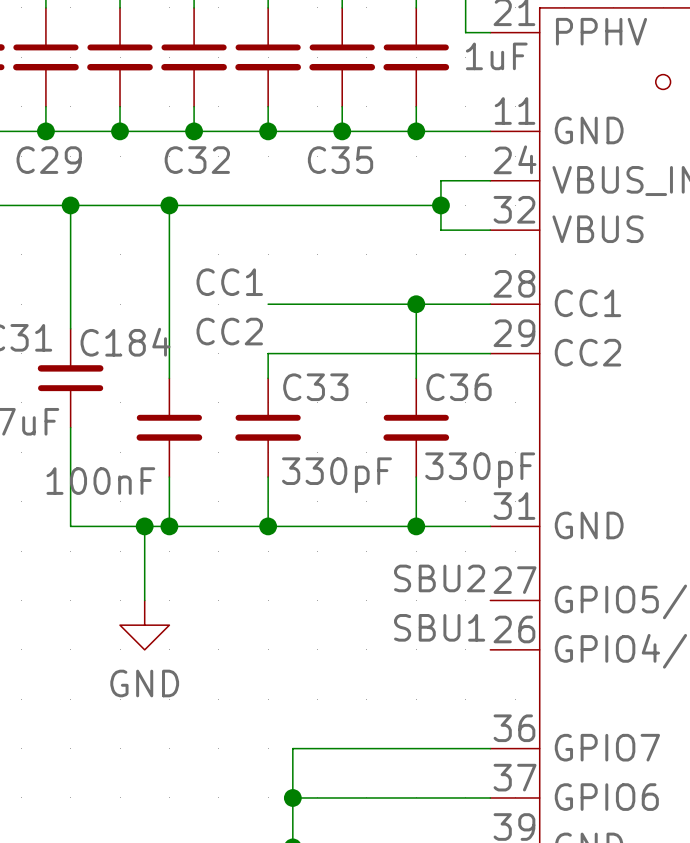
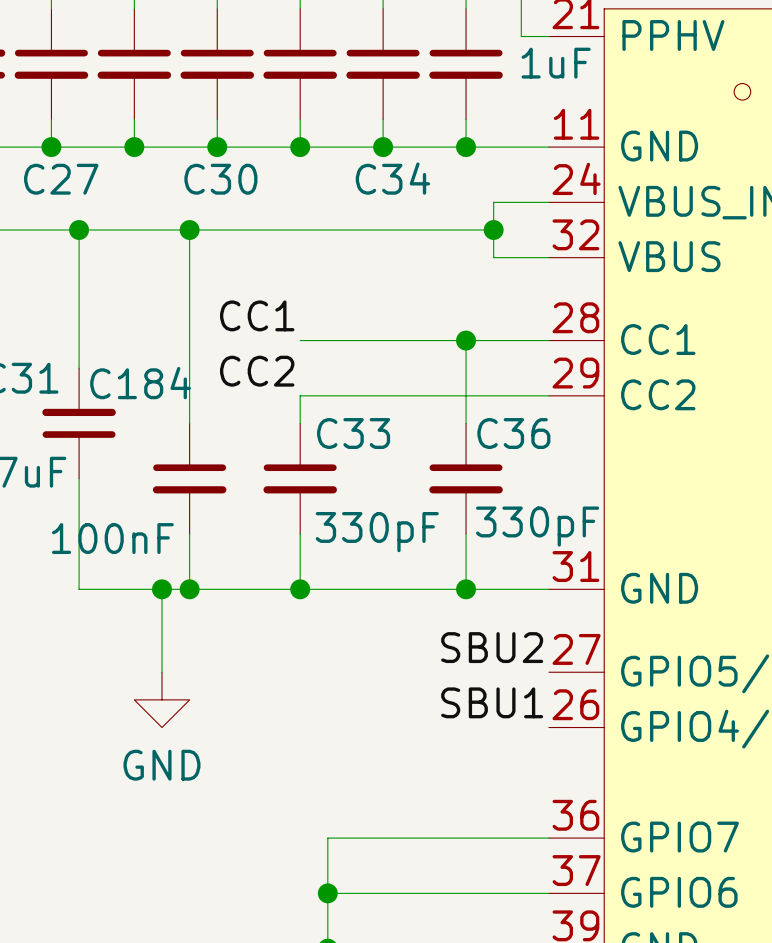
C29 name: C29 (49, 160) -> C27 (61, 179)
C32 name: C32 (197, 160) -> C30 (220, 179)
C35 name: C35 (340, 160) -> C34 (392, 178)

